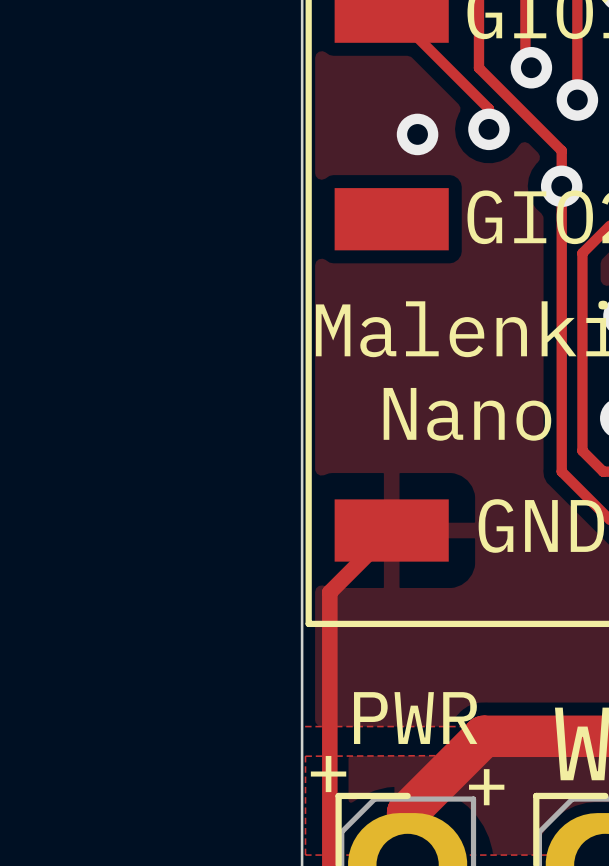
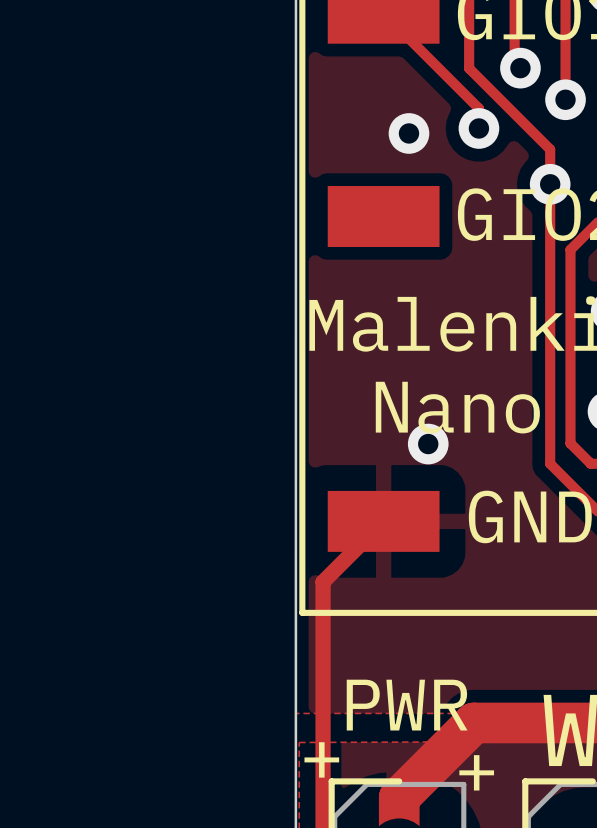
via: none -> (428, 444)

